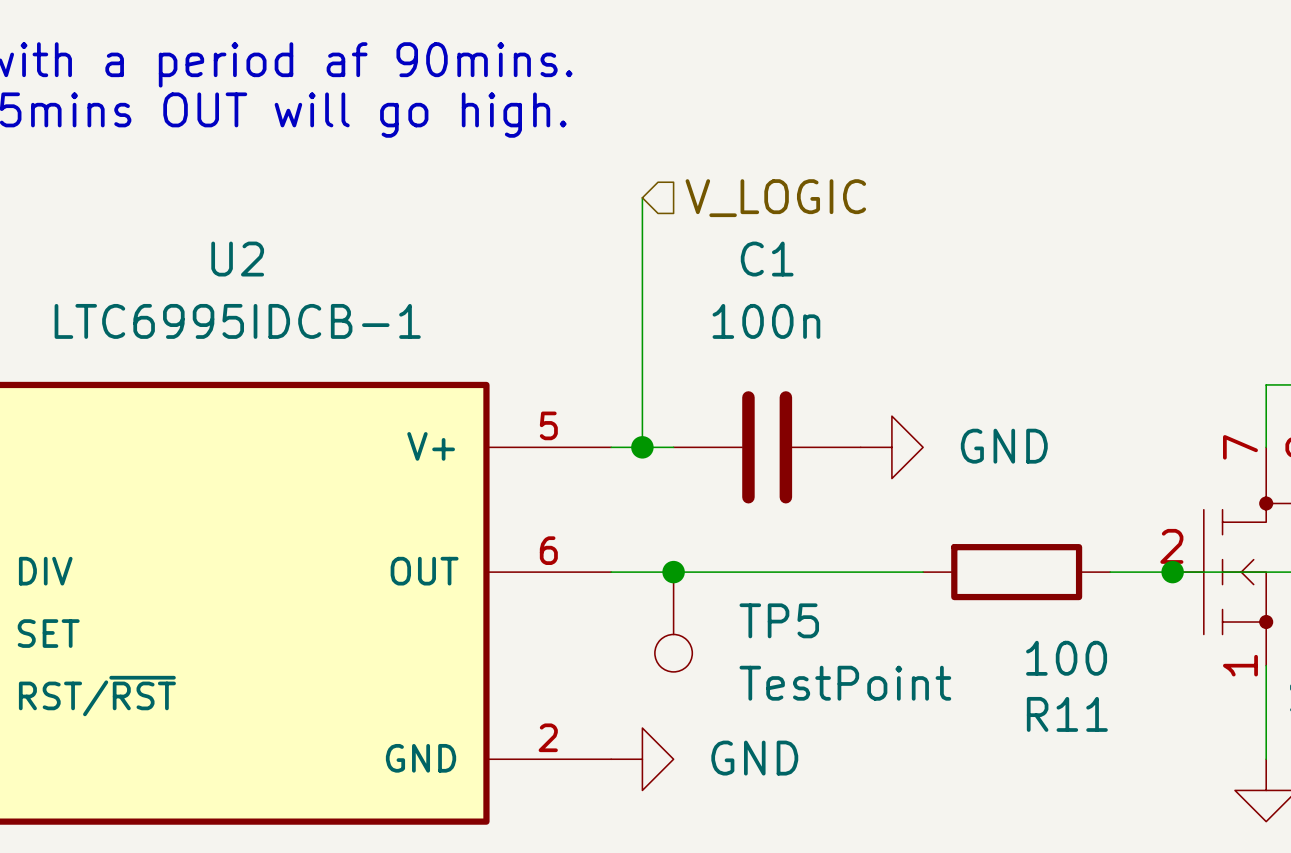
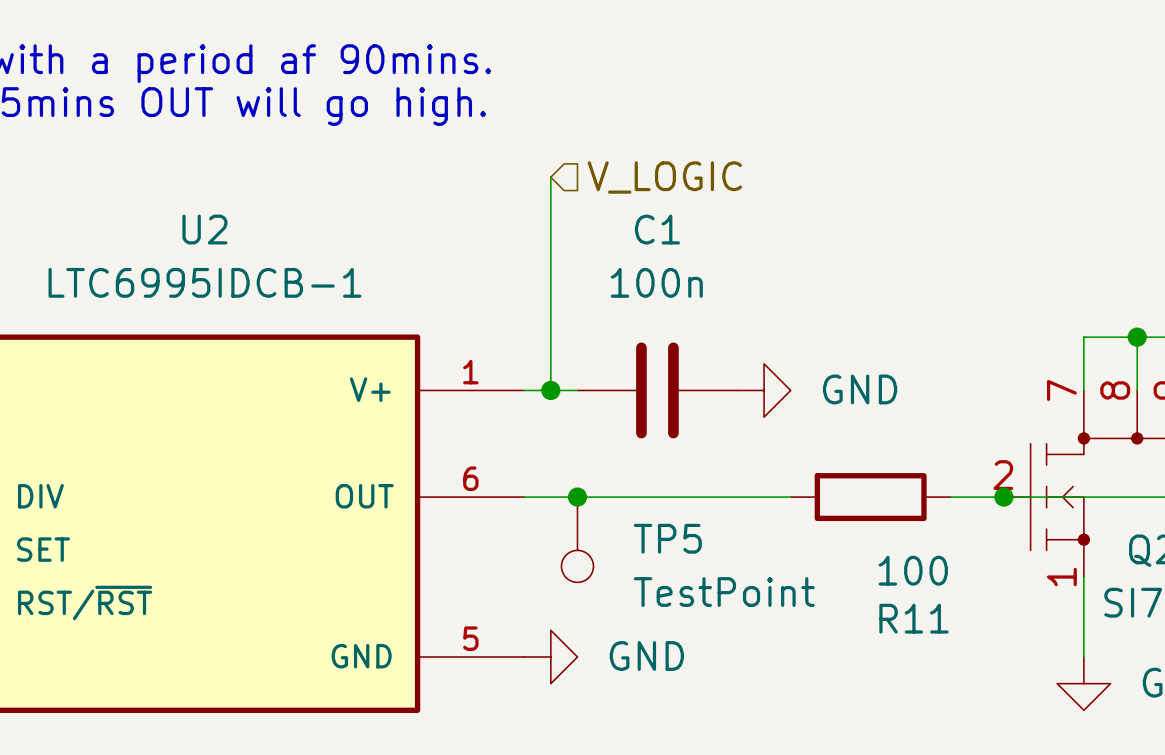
U2 pin number: 5 (548, 425) -> 1 (470, 372)
U2 pin number: 2 (548, 737) -> 5 (470, 638)

